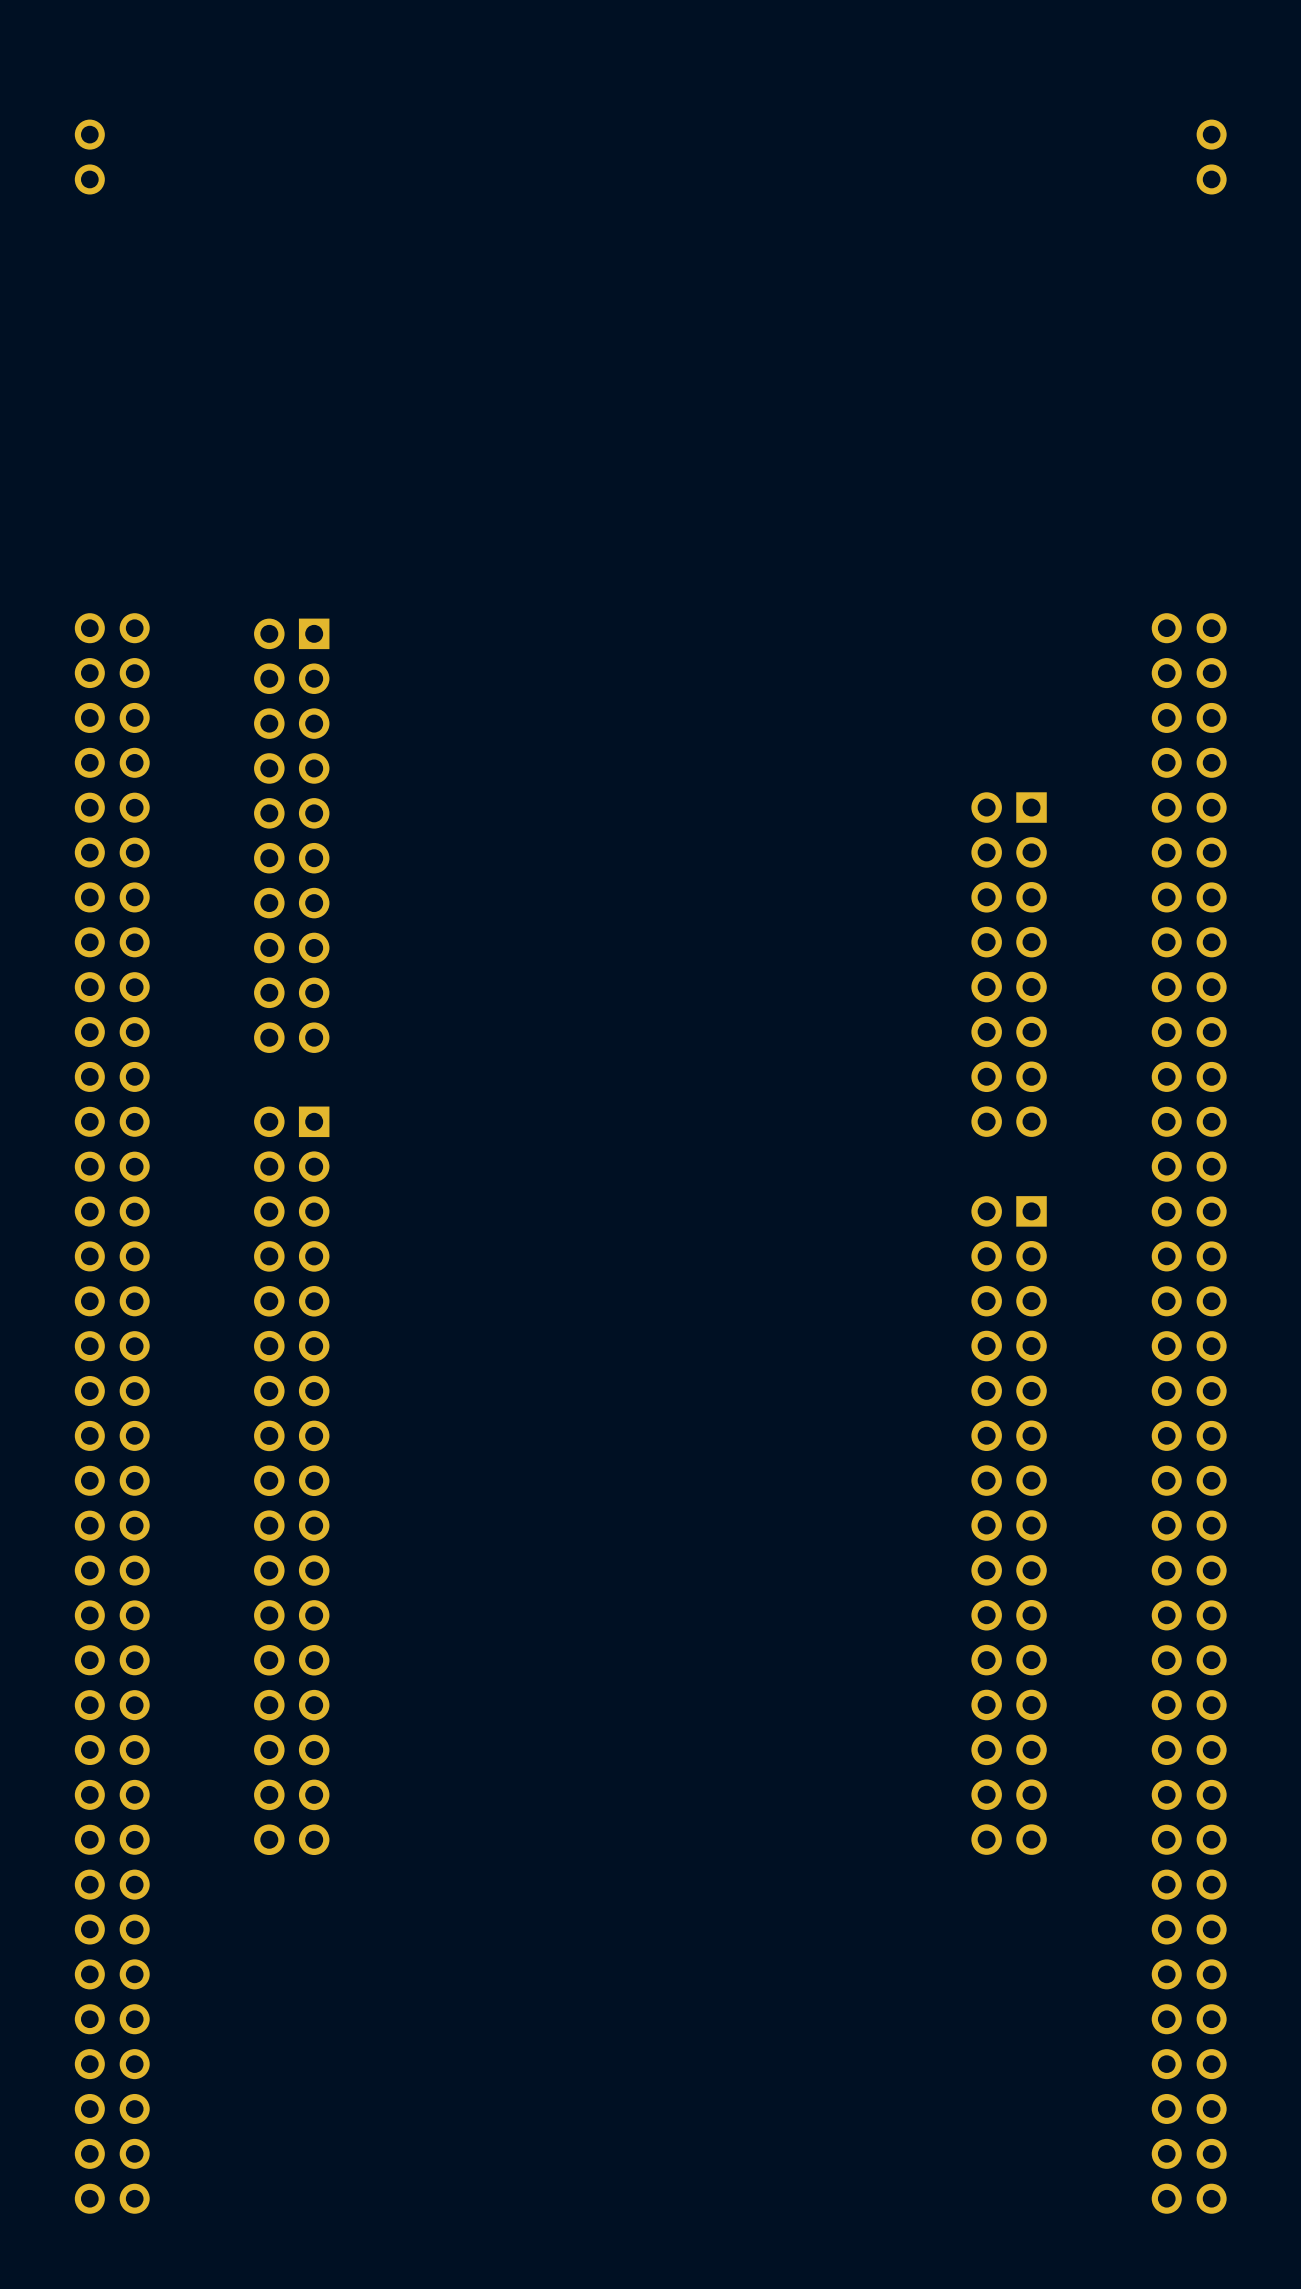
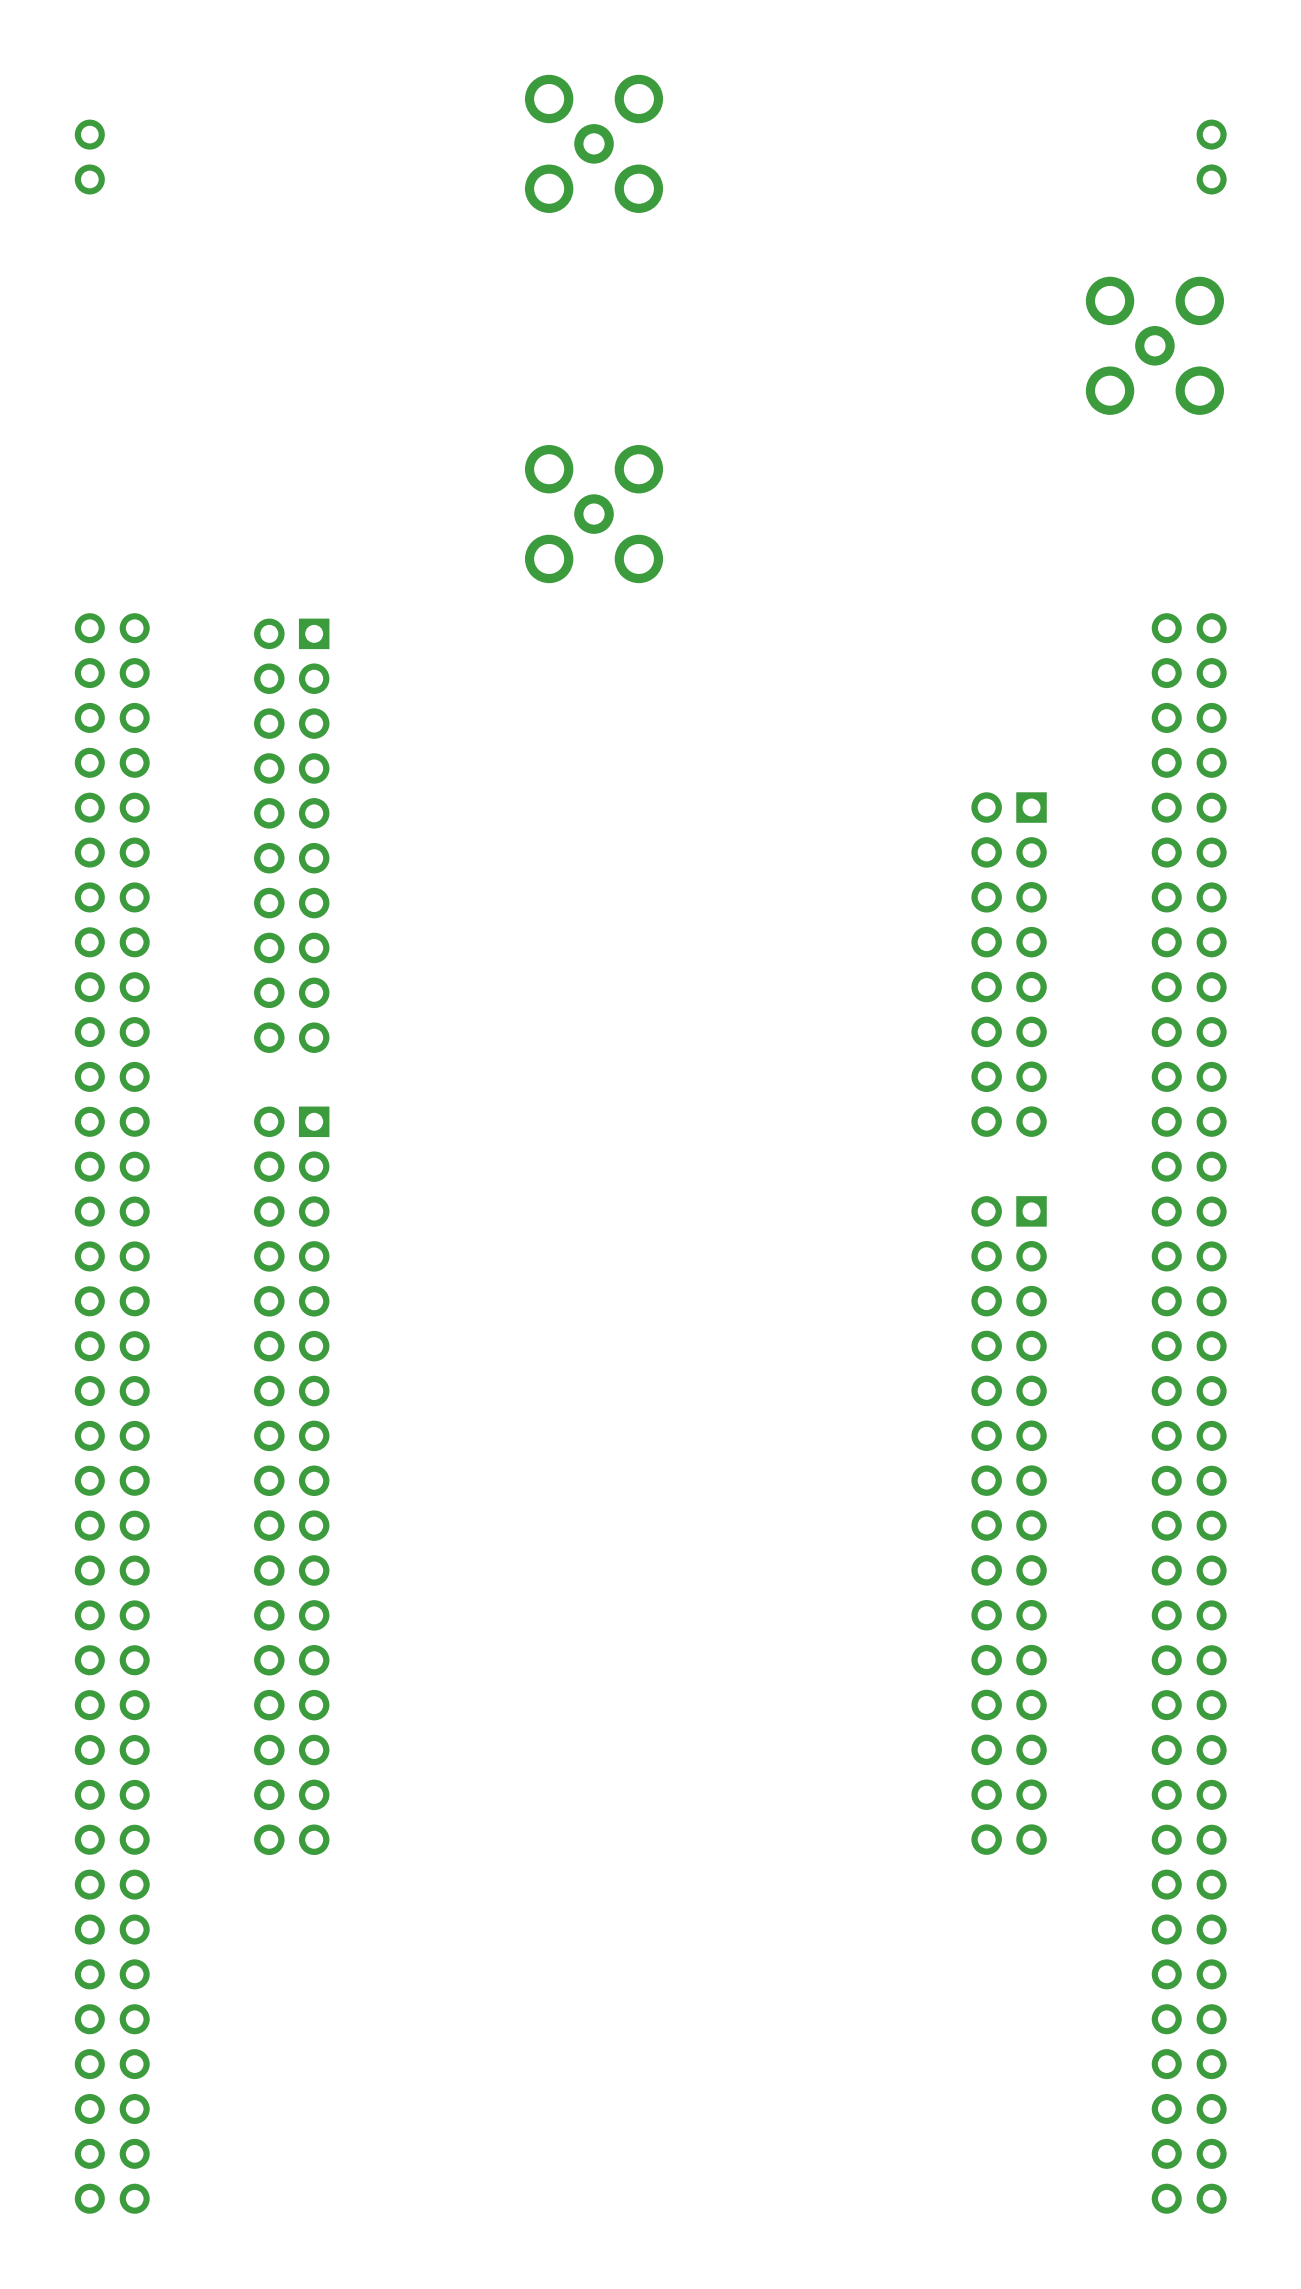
part: none -> (594, 143)
part: none -> (1154, 345)
part: none -> (594, 514)

